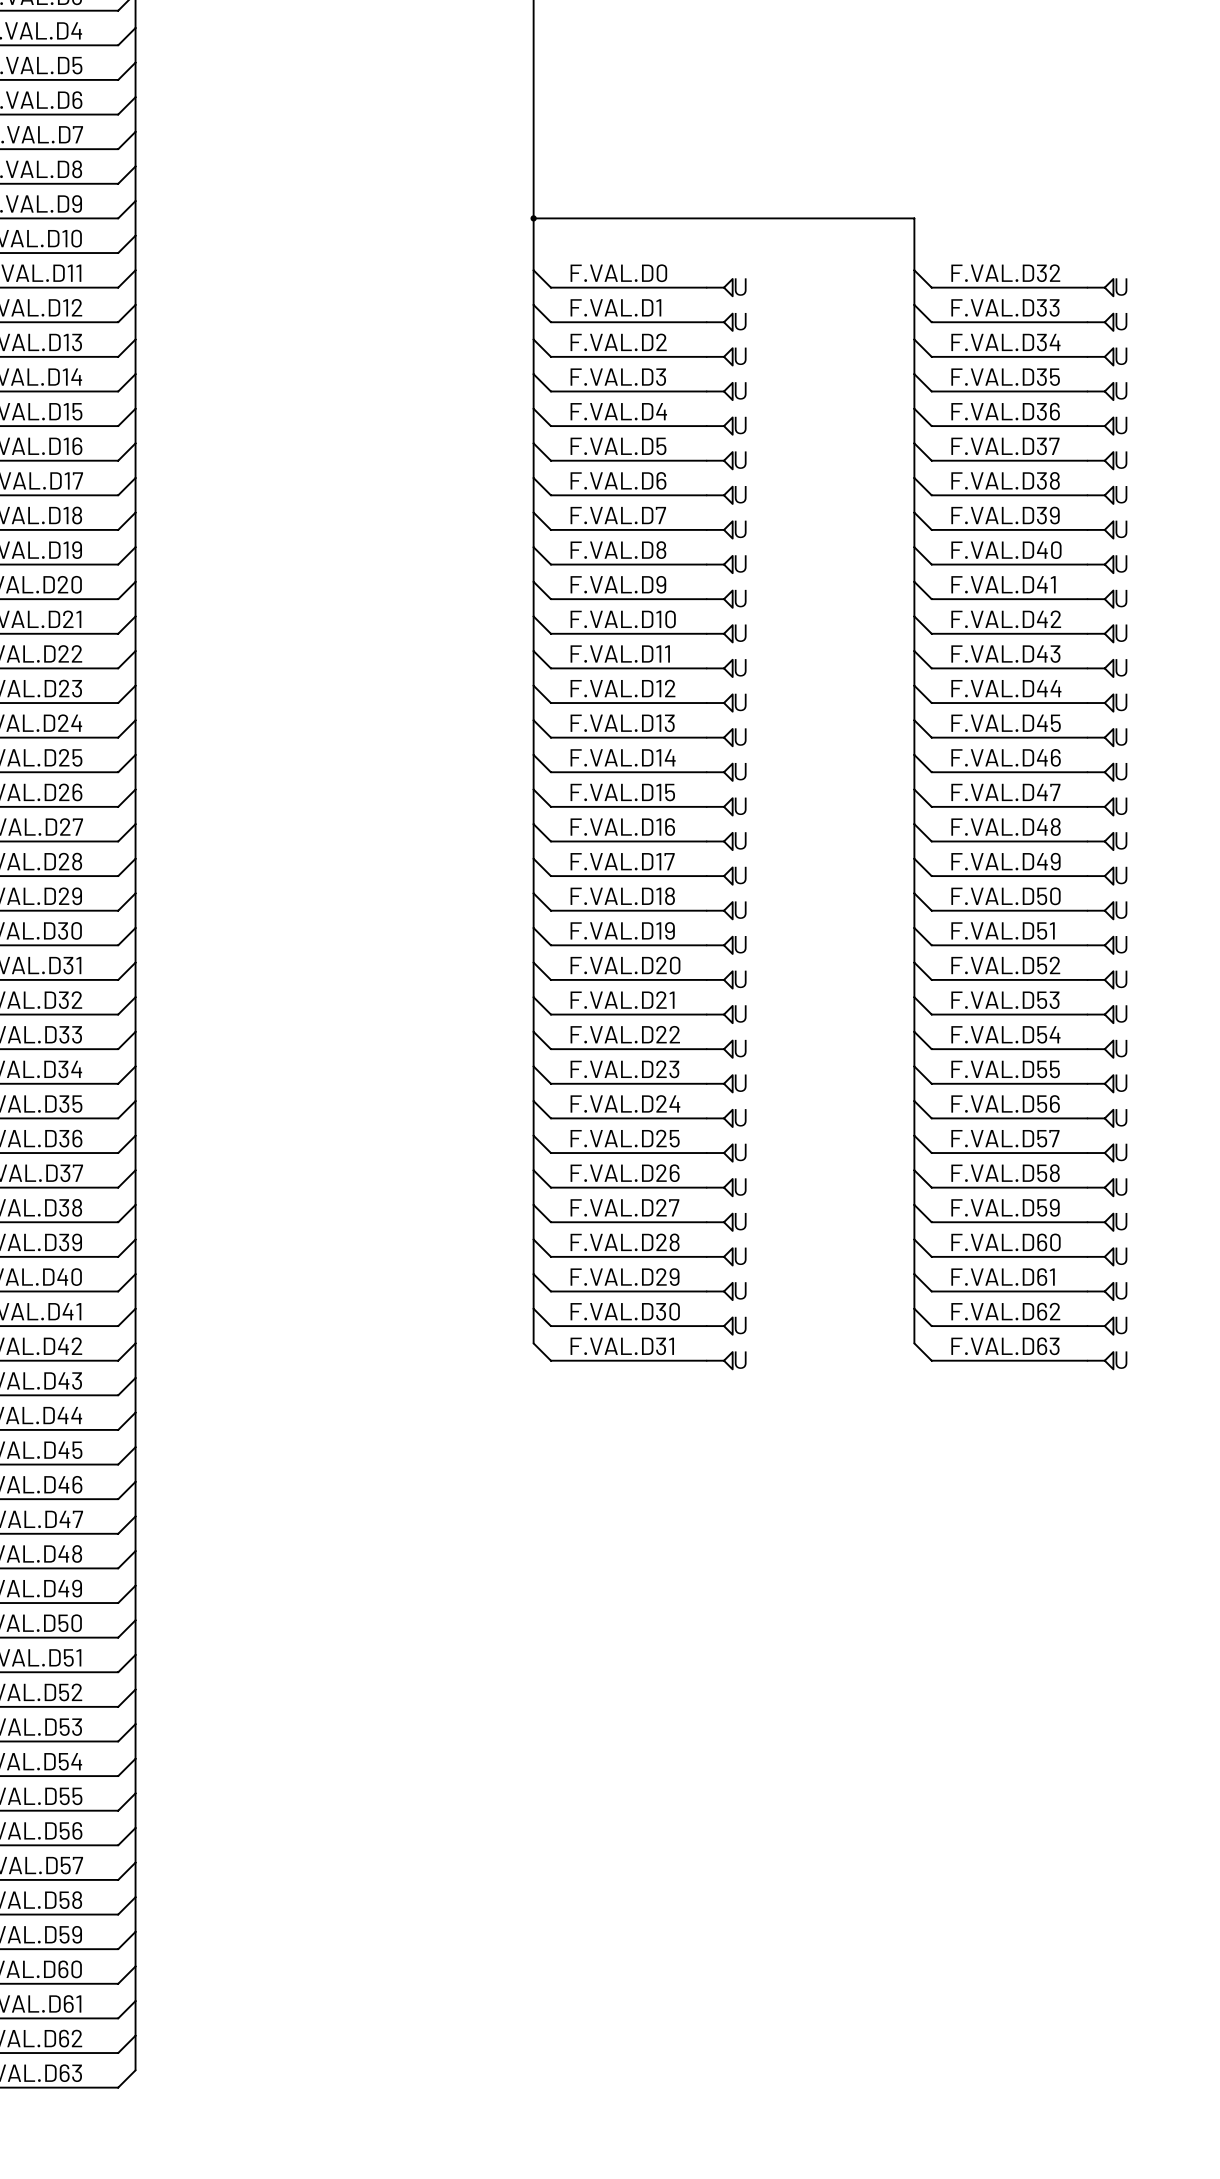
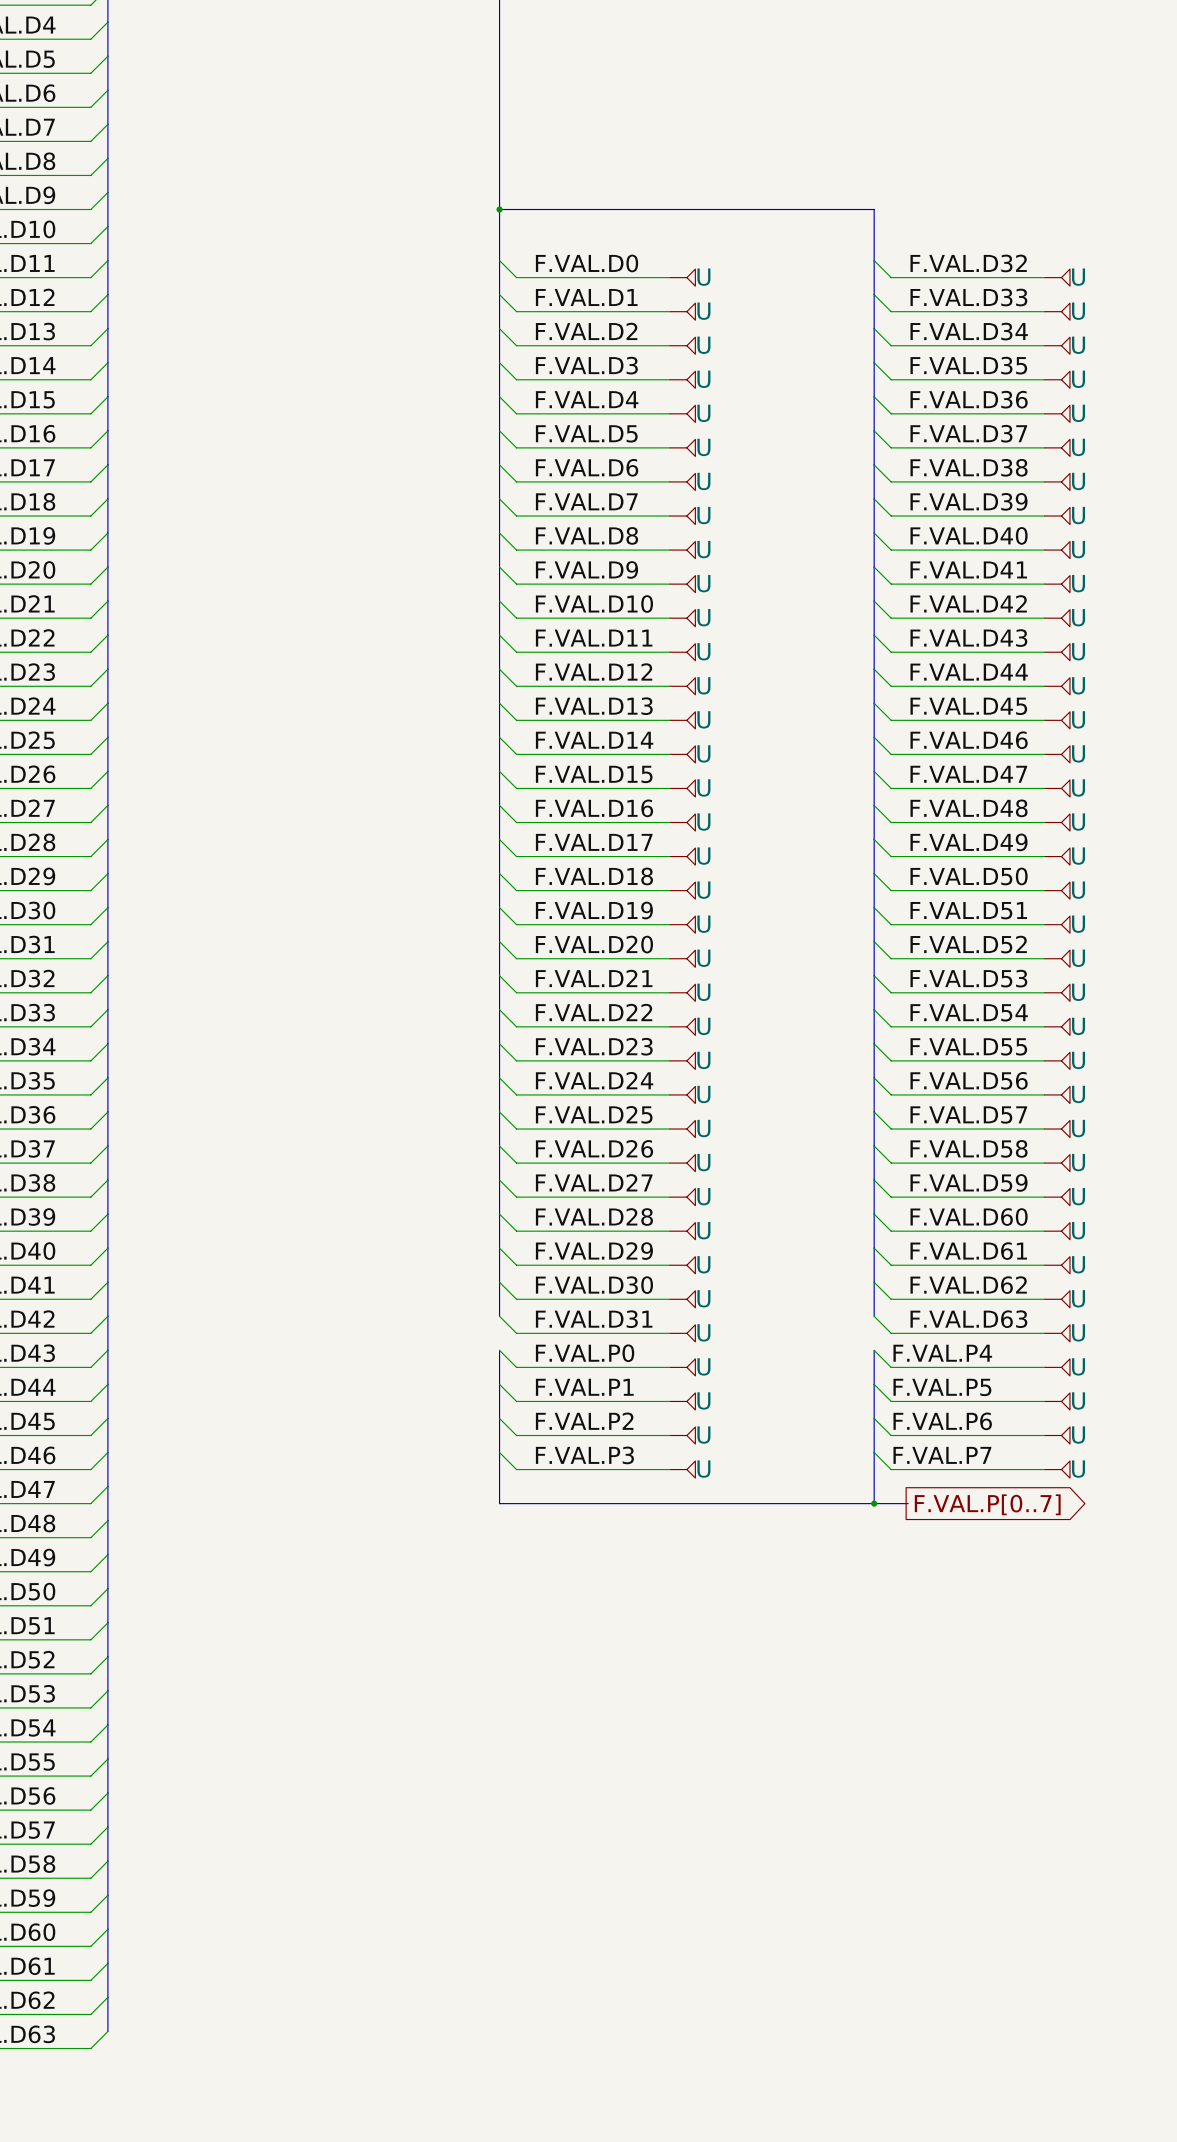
wire: none -> (499, 1350) (516, 1367) (669, 1367)
bus: none -> (499, 1350) (499, 1503) (908, 1503)
wire: none -> (874, 1350) (891, 1367) (1044, 1367)
bus: none -> (874, 1350) (874, 1503)
label: none -> F.VAL.P0 (585, 1353)
label: none -> F.VAL.P4 (942, 1353)
U: none -> (682, 1367)
U: none -> (1057, 1367)
wire: none -> (499, 1384) (516, 1401) (669, 1401)
wire: none -> (874, 1384) (891, 1401) (1044, 1401)
label: none -> F.VAL.P1 (584, 1387)
label: none -> F.VAL.P5 (942, 1387)
U: none -> (682, 1401)
U: none -> (1057, 1401)
wire: none -> (499, 1418) (516, 1435) (669, 1435)
wire: none -> (874, 1418) (891, 1435) (1044, 1435)
label: none -> F.VAL.P2 (584, 1421)
label: none -> F.VAL.P6 (942, 1421)
U: none -> (682, 1435)
U: none -> (1057, 1435)
wire: none -> (499, 1452) (516, 1469) (669, 1469)
wire: none -> (874, 1452) (891, 1469) (1044, 1469)
label: none -> F.VAL.P3 (584, 1455)
label: none -> F.VAL.P7 (942, 1455)
U: none -> (682, 1469)
U: none -> (1057, 1469)
junction: none -> (874, 1503)
global label: none -> F.VAL.P[0..7] (987, 1504)

